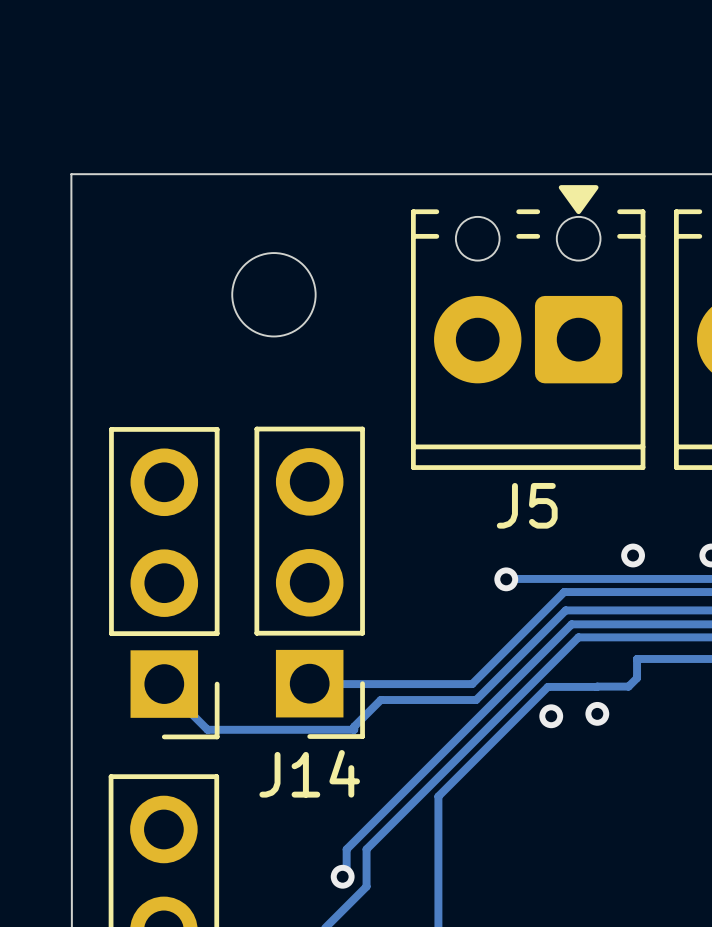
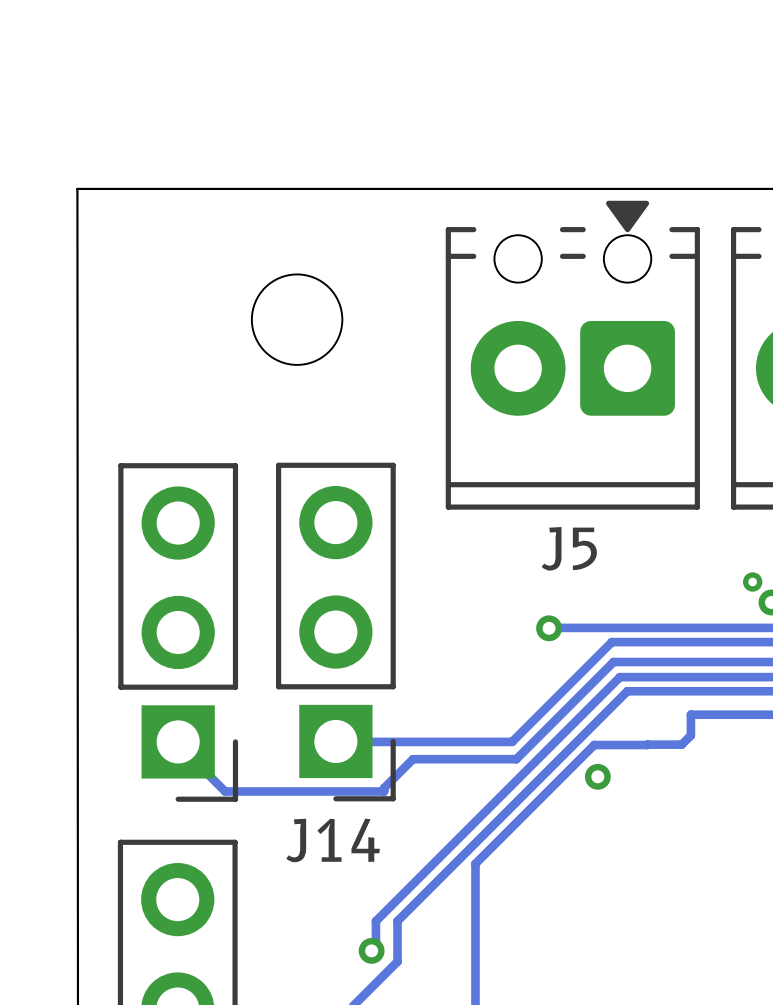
via: none -> (752, 581)
via: (633, 555) -> none
via: (597, 713) -> none

